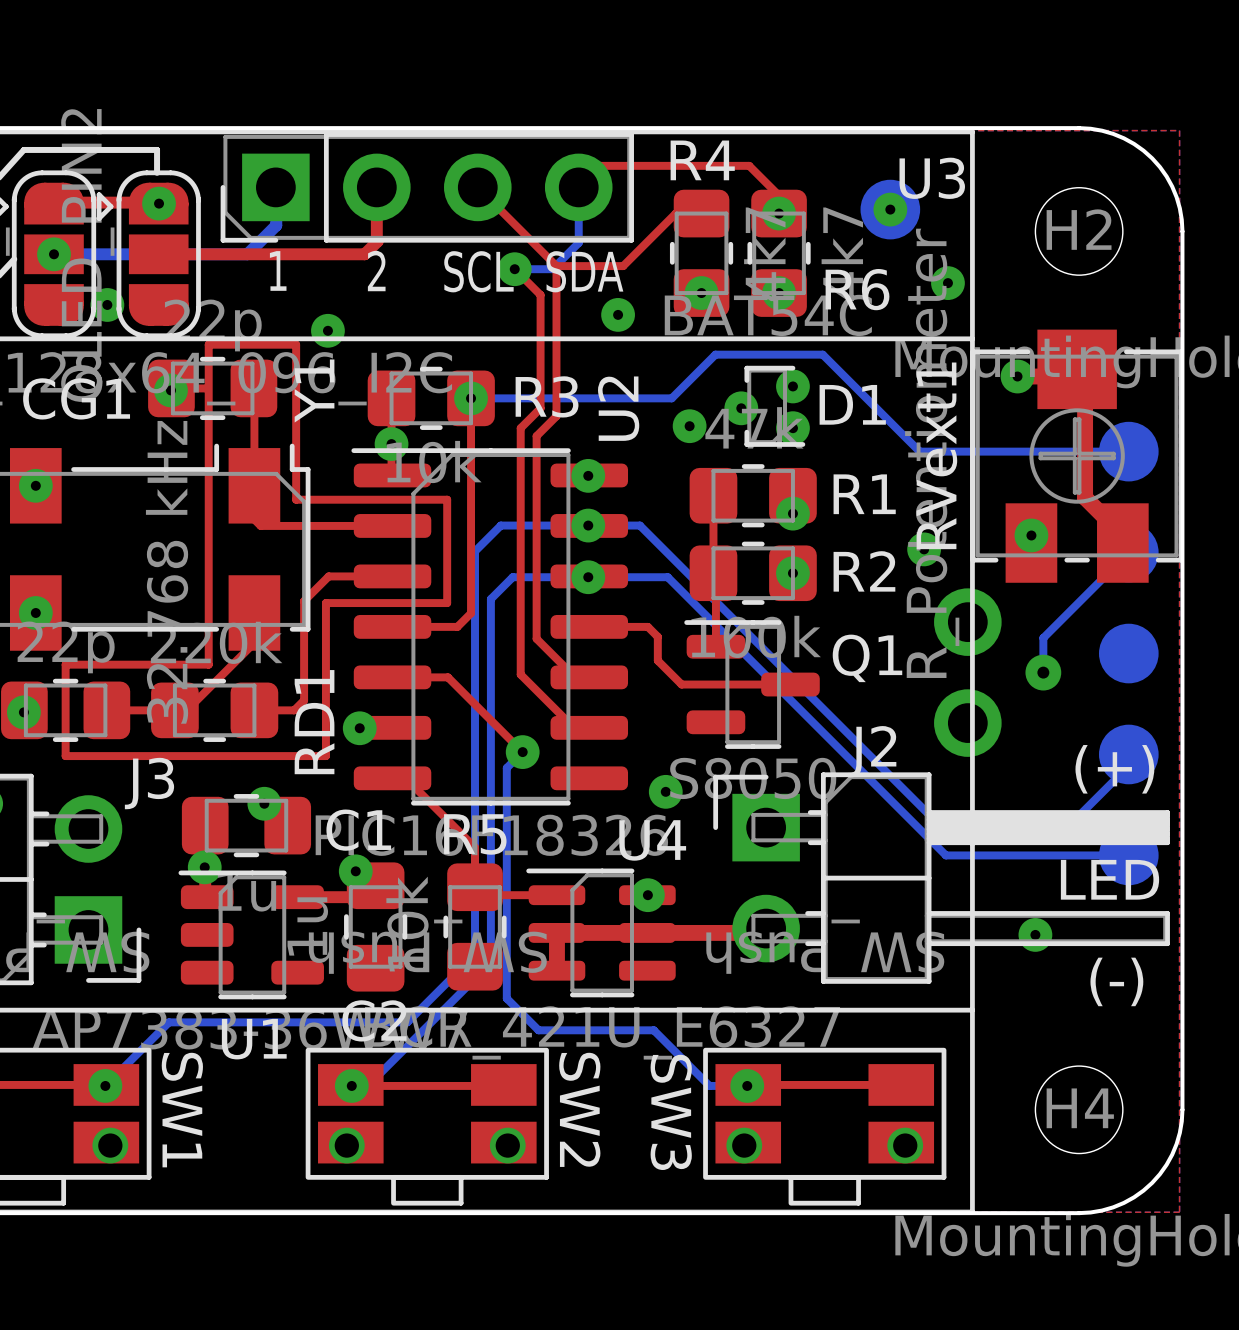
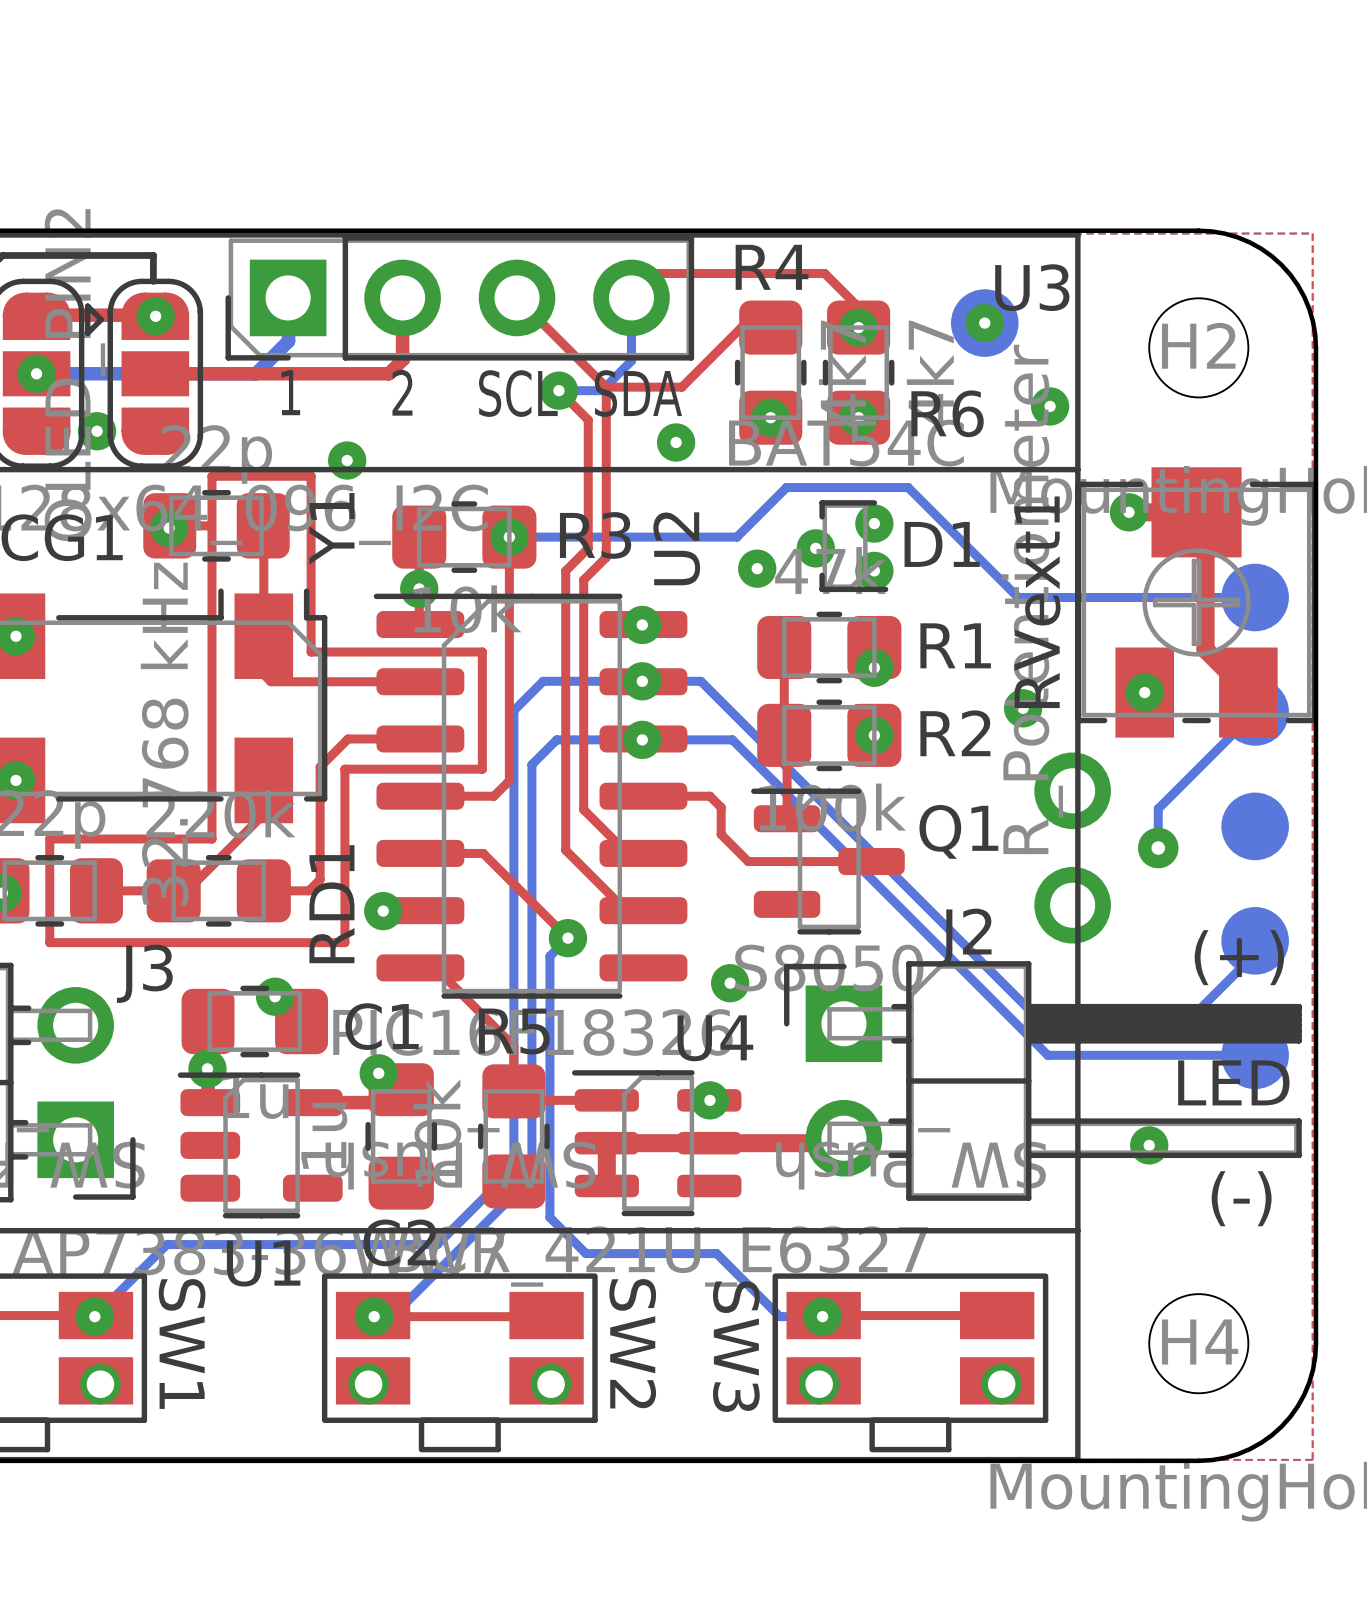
RVext1 footprint: [970, 329, 1184, 583] -> [1075, 467, 1318, 738]

